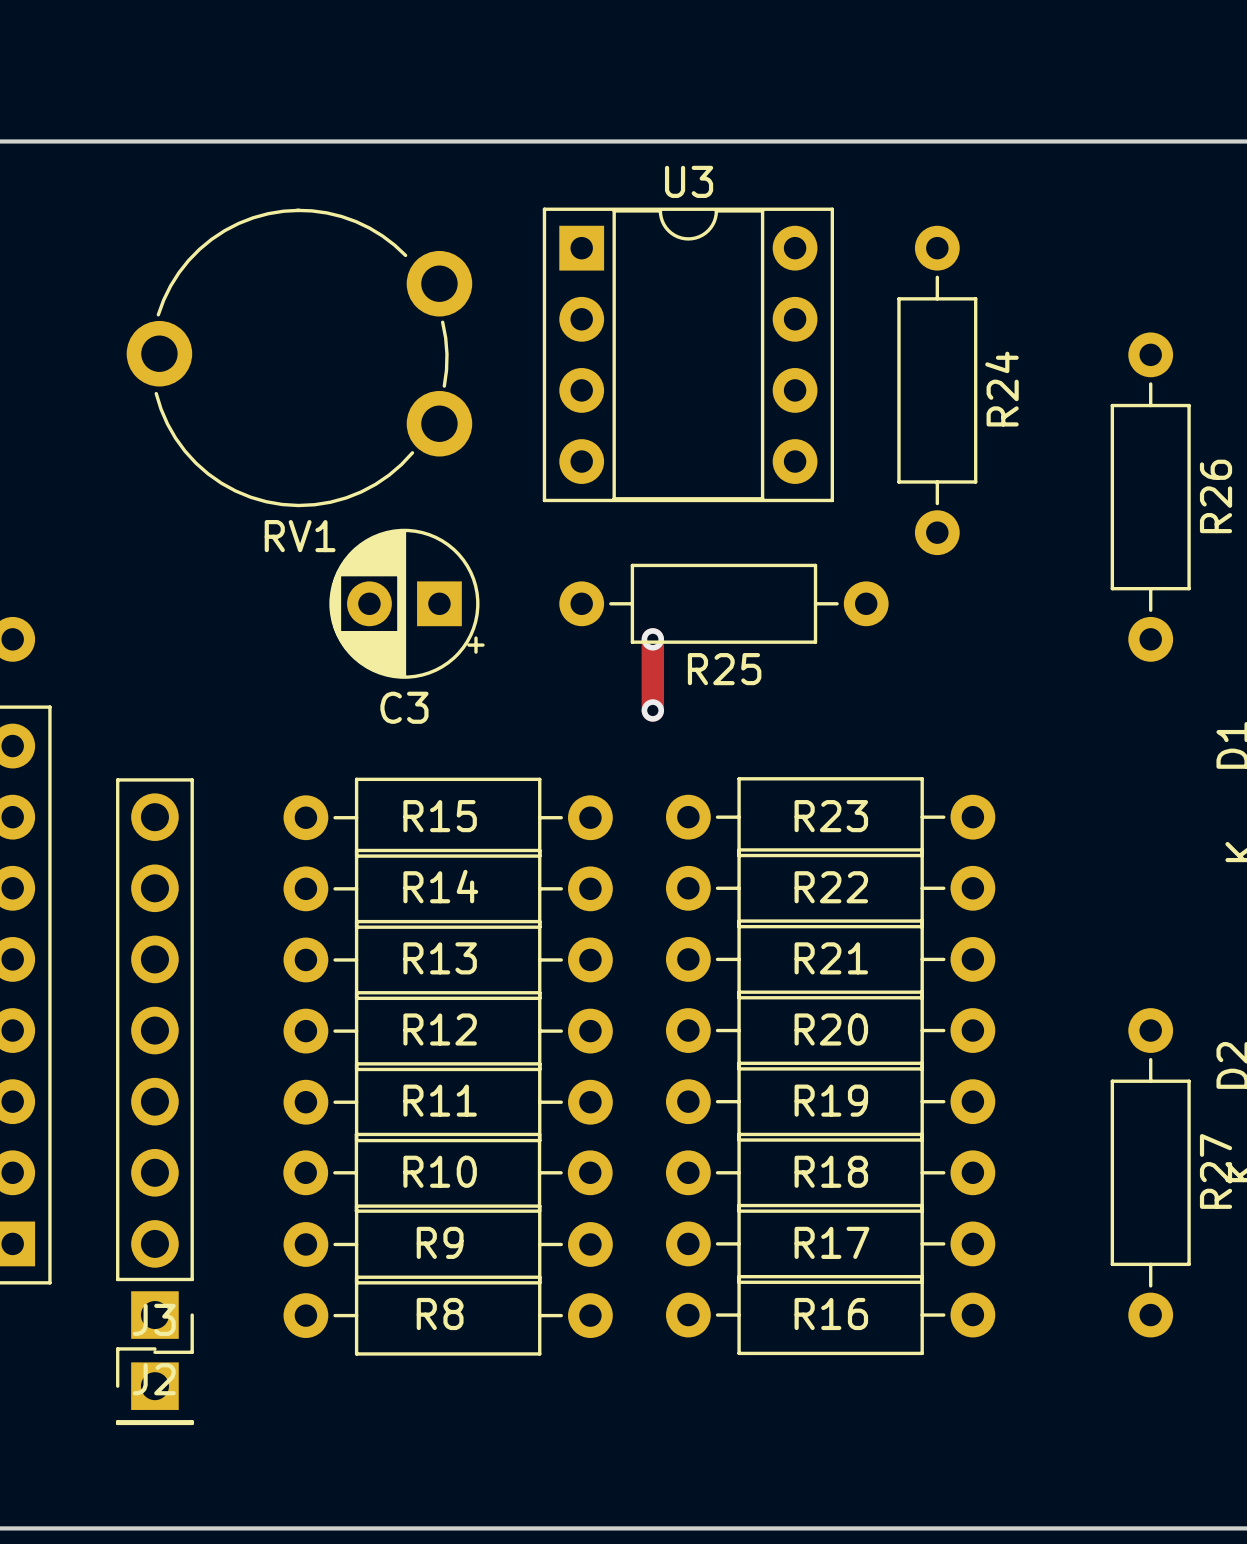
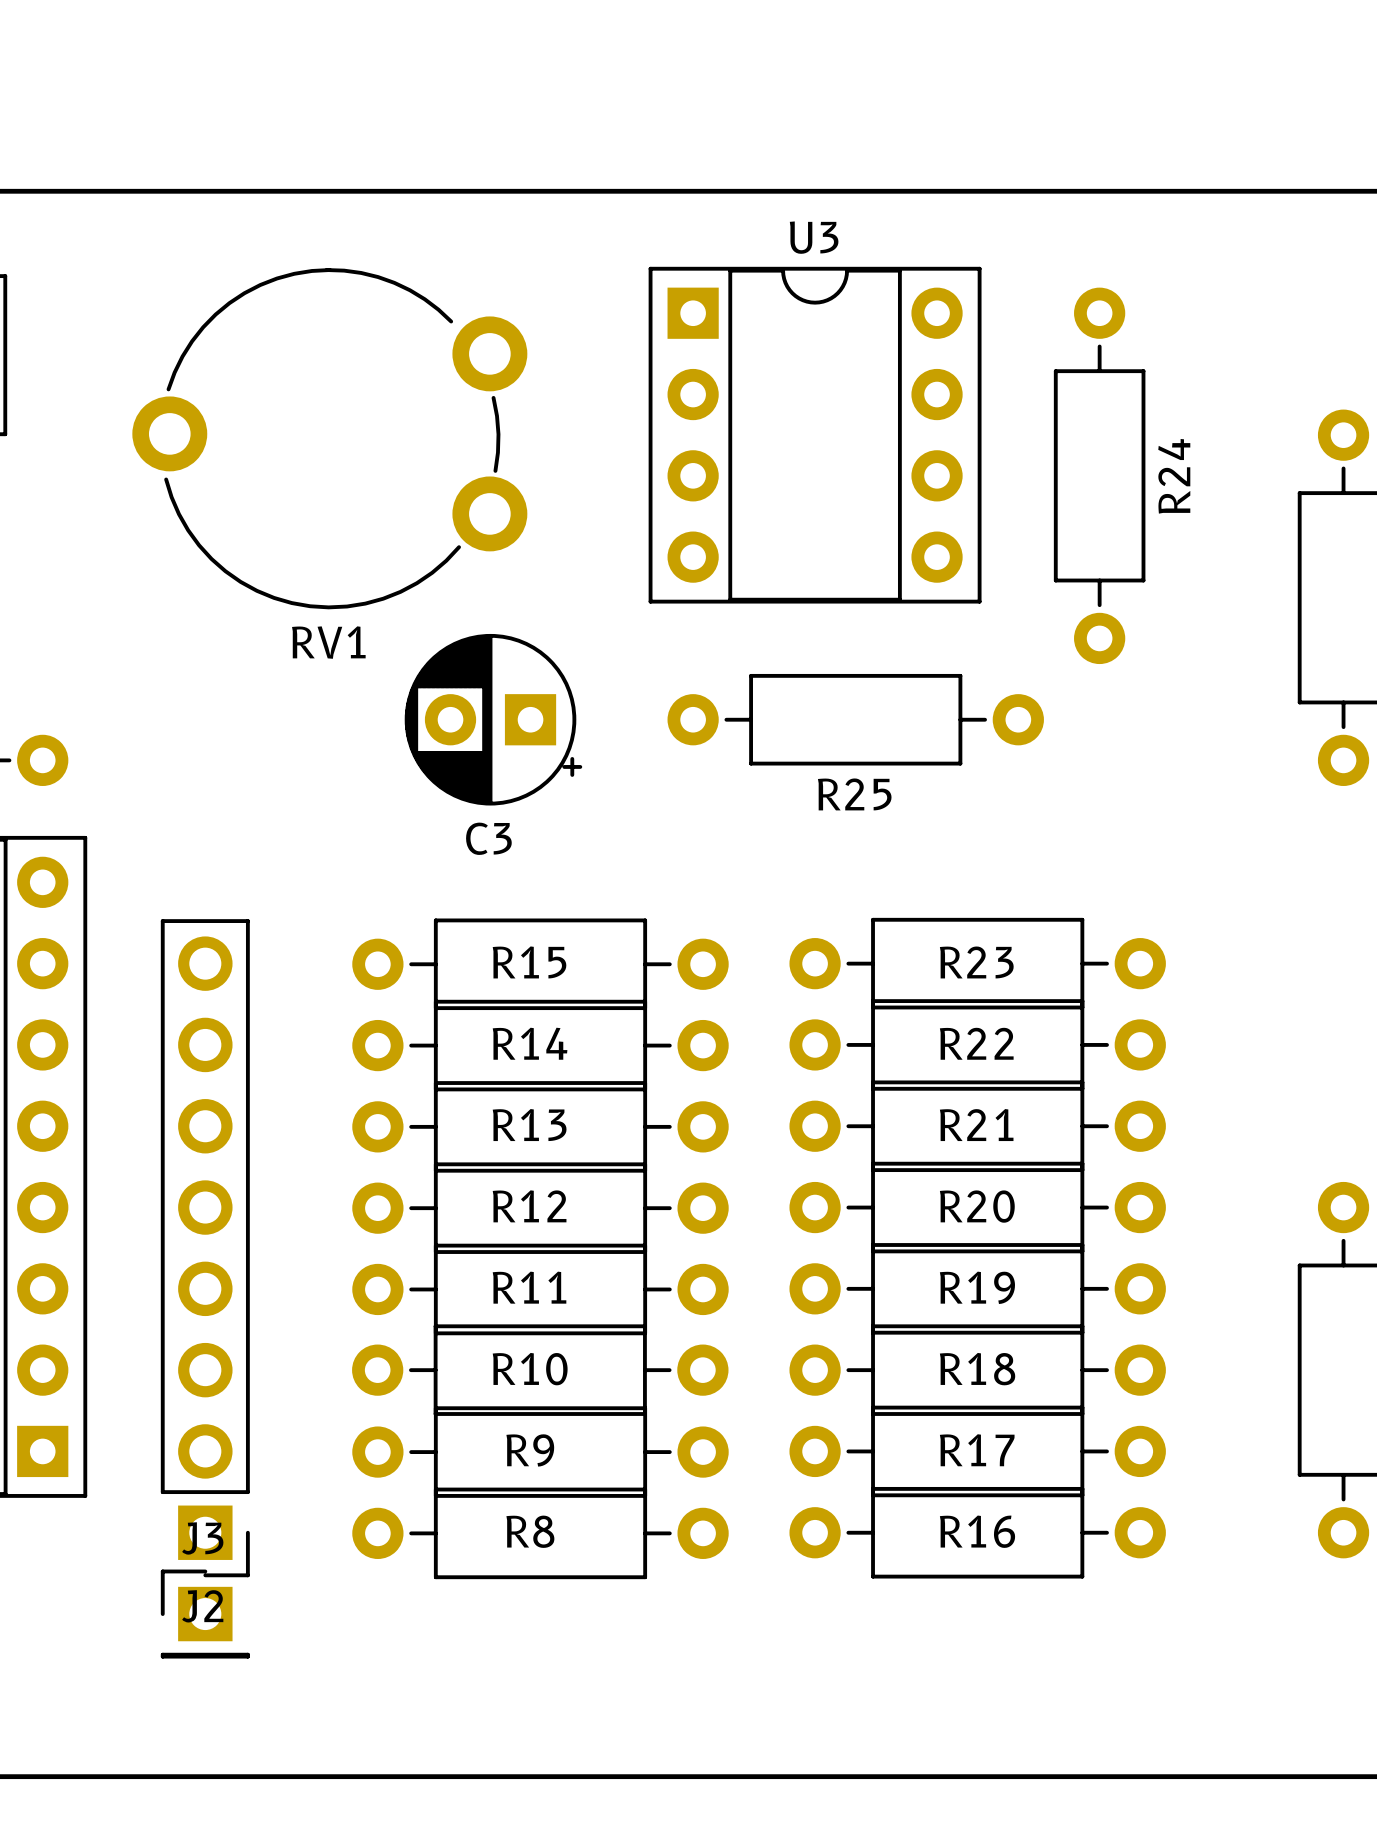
RV1 position: (299, 357) -> (329, 438)
track: (652, 639) (652, 710) -> none
via: (652, 639) -> none
via: (652, 710) -> none

